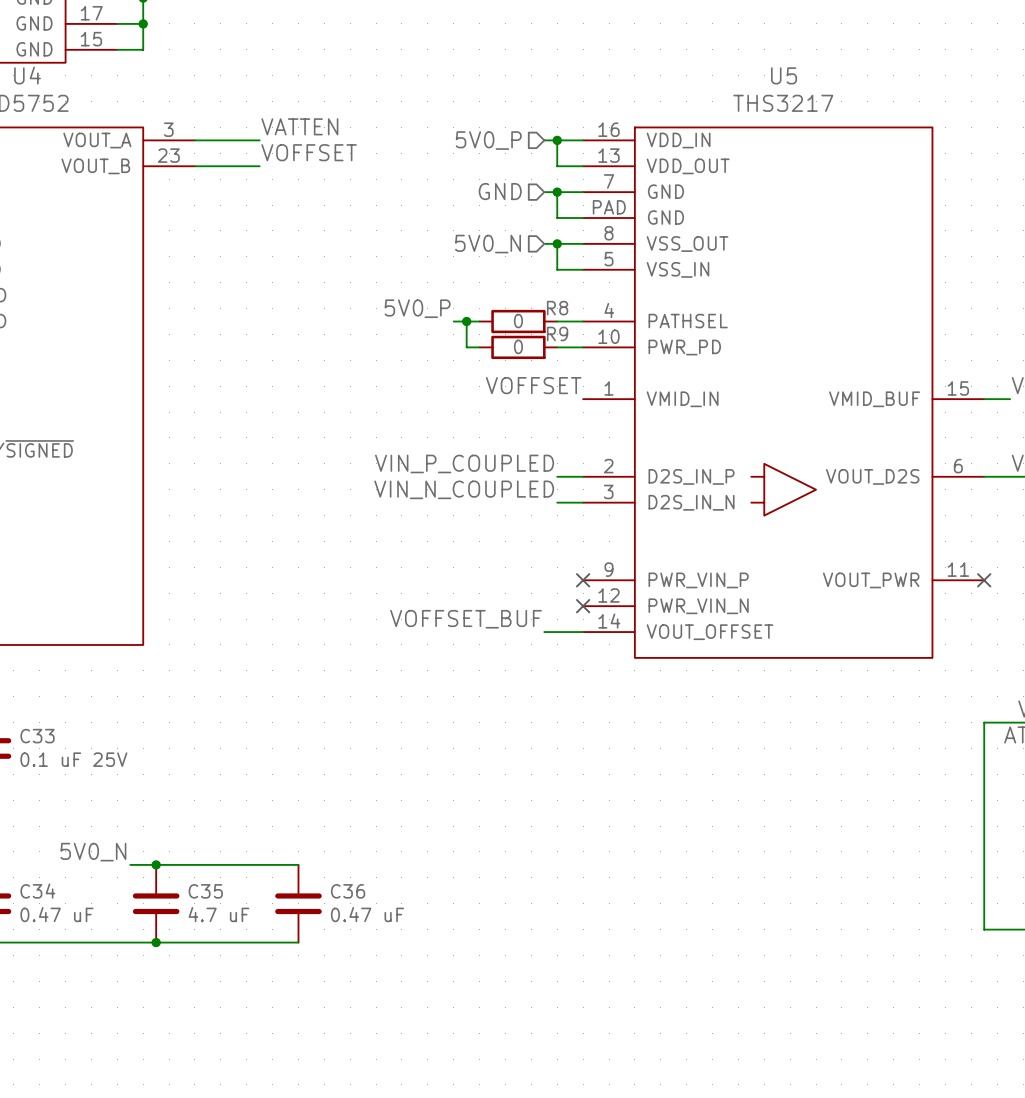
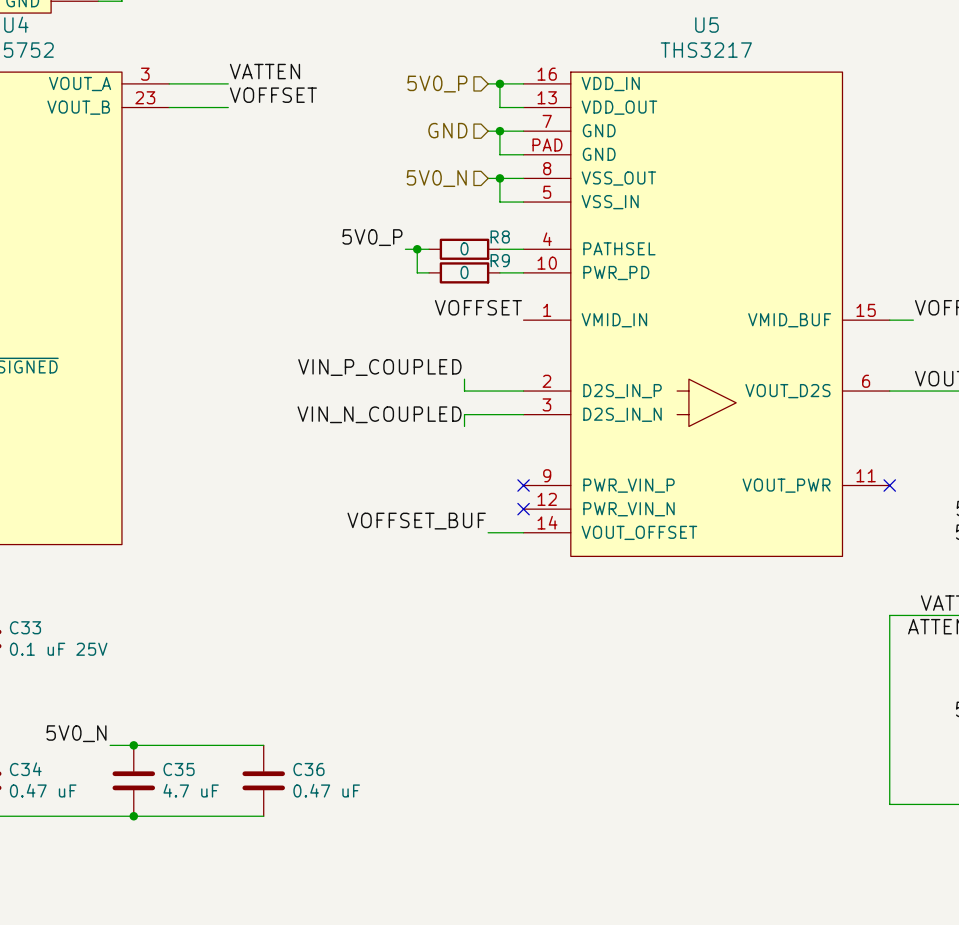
label position: VIN_P_COUPLED (464, 463) -> VIN_P_COUPLED (379, 367)
wire: none -> (464, 379) (464, 391) (499, 391)
label position: VIN_N_COUPLED (464, 489) -> VIN_N_COUPLED (379, 414)
wire: none -> (499, 414) (464, 414) (464, 426)

